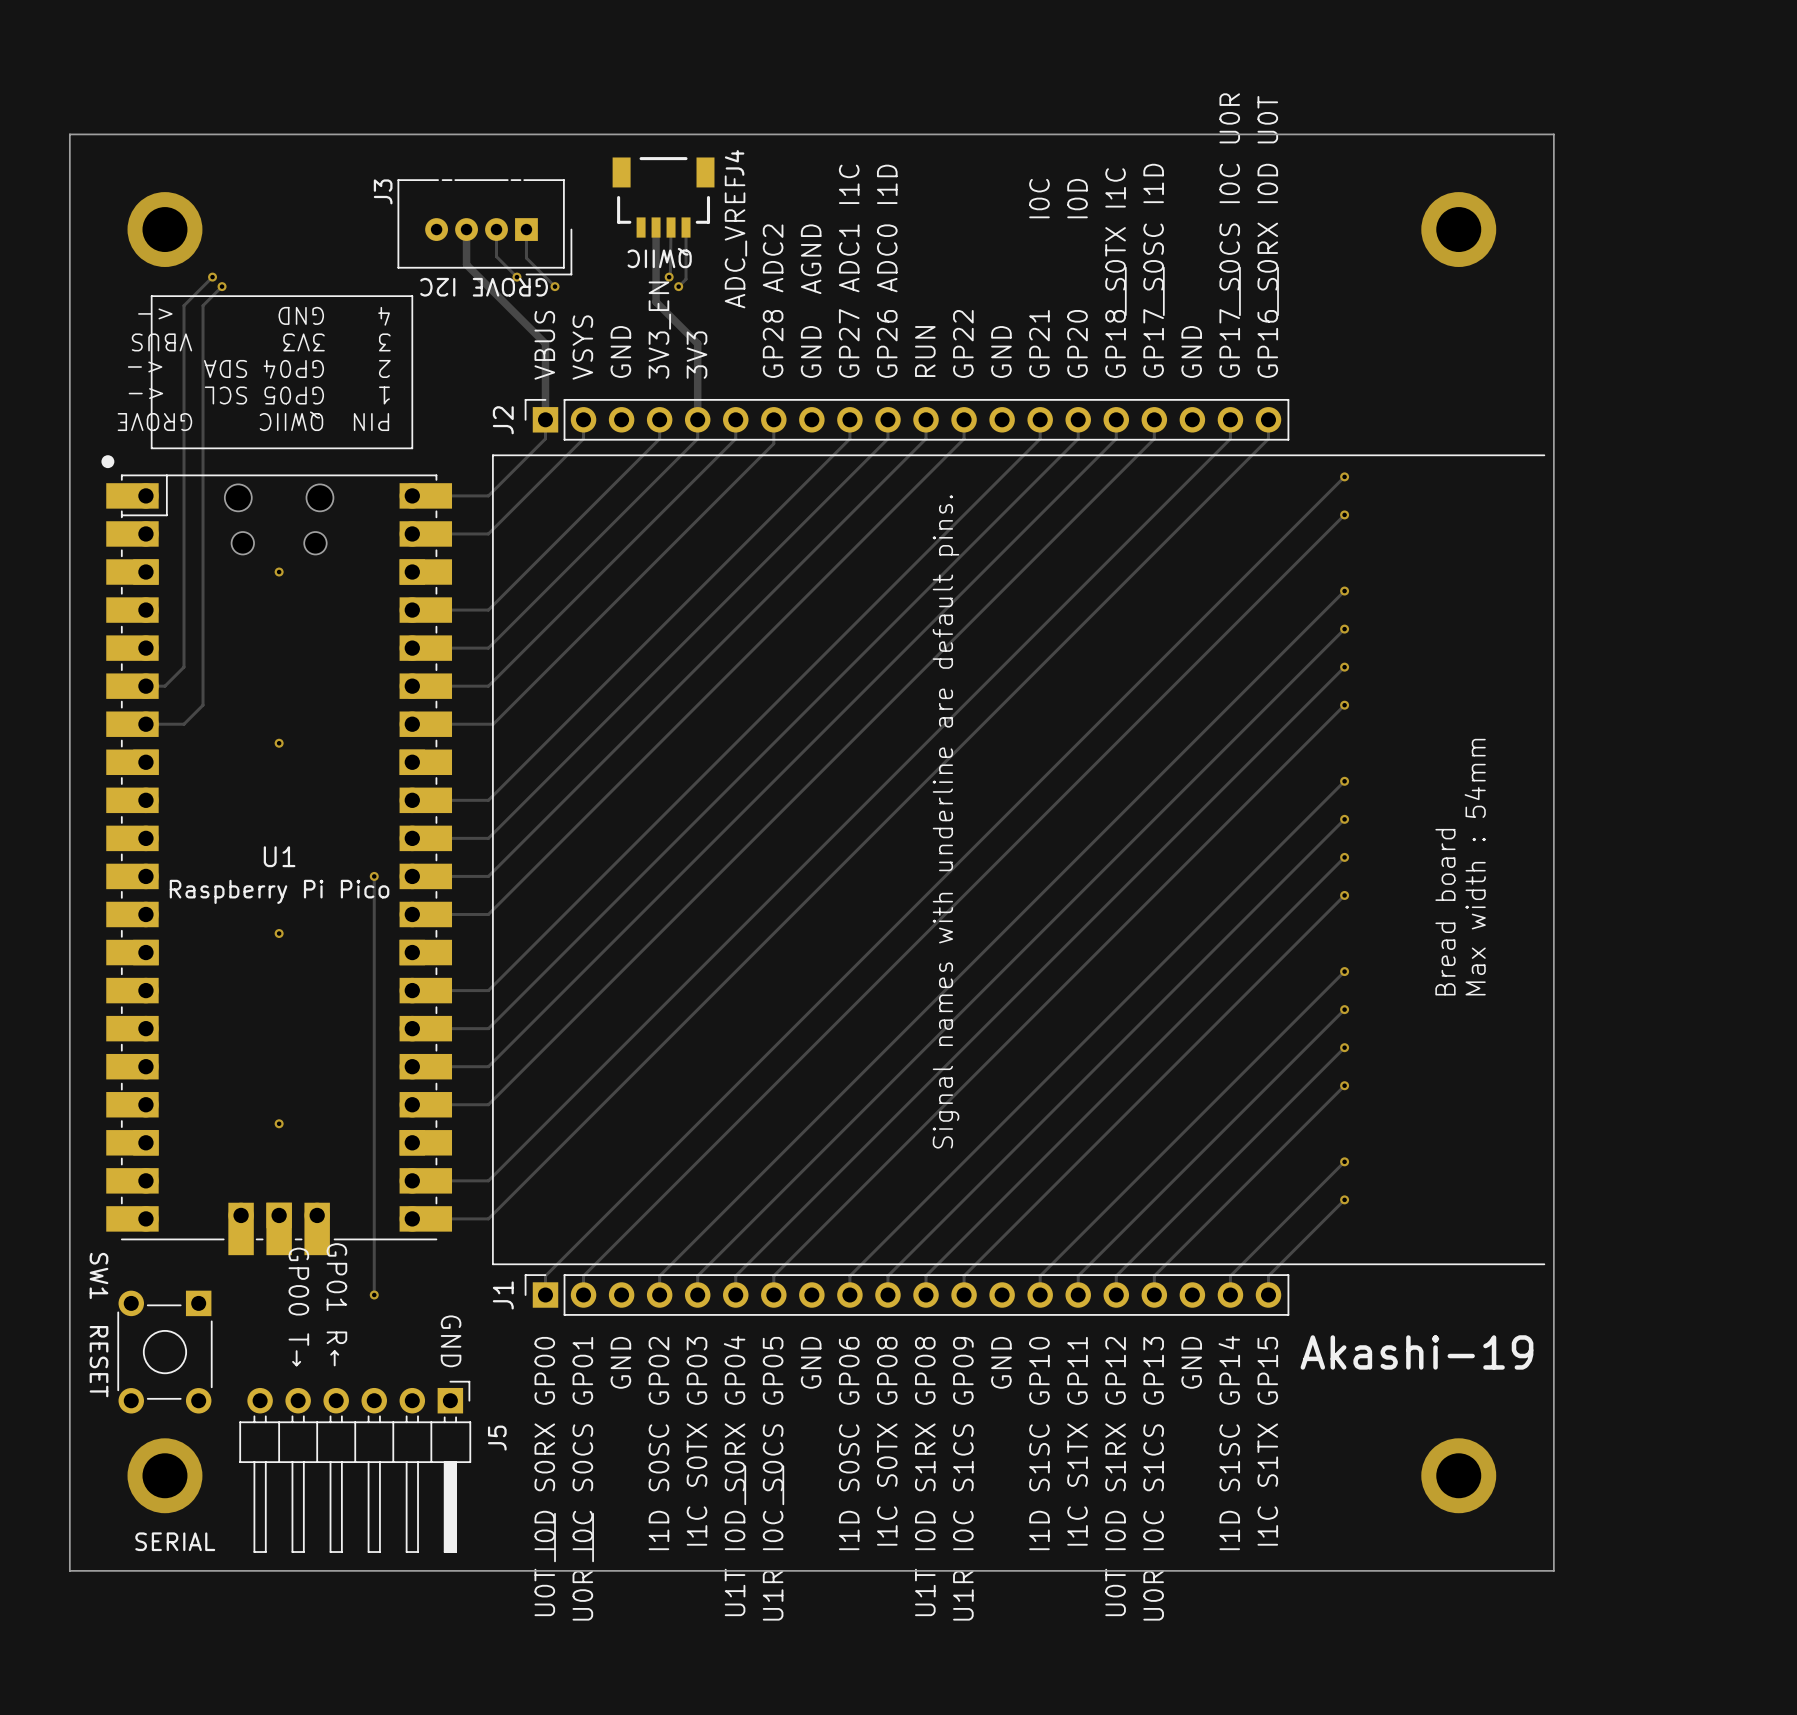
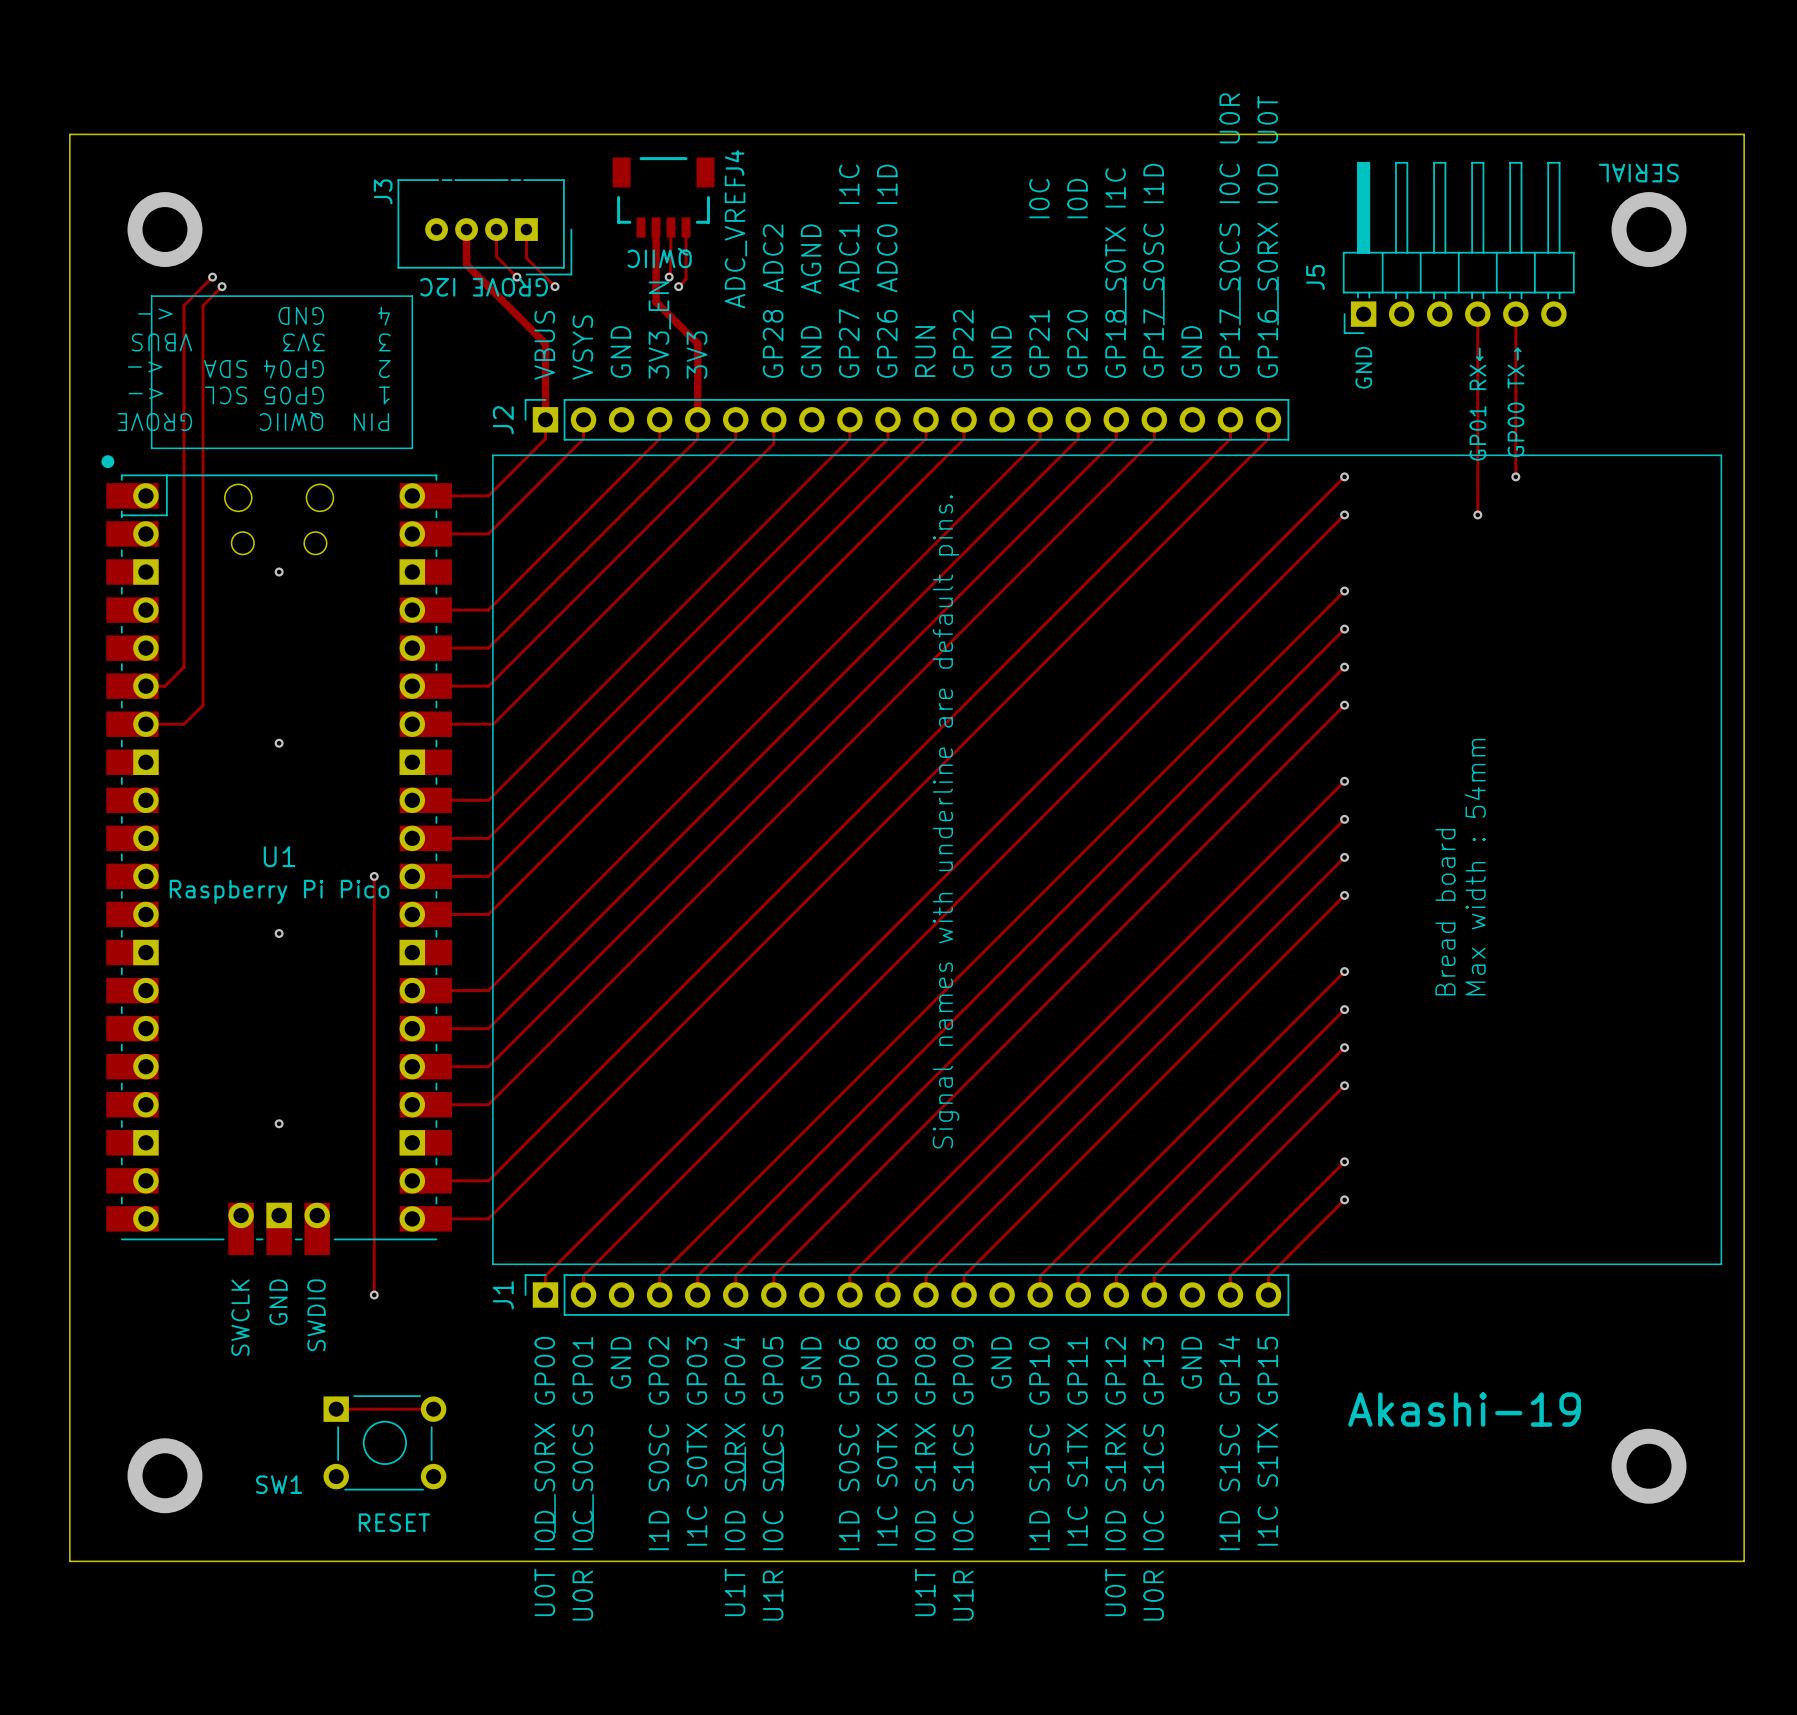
board edge: (1553, 134) (1553, 1570) (69, 1570) (69, 1561) -> (1553, 134) (1744, 134) (1744, 1561) (69, 1561)
via: (1458, 229) -> none
via: none -> (1649, 229)
line: (1125, 267) (1125, 277) -> (1125, 315) (1125, 324)
line: (1163, 267) (1163, 277) -> (1163, 315) (1163, 324)
line: (1239, 267) (1239, 277) -> (1239, 315) (1239, 324)
line: (1278, 267) (1278, 277) -> (1278, 315) (1278, 324)
track: none -> (1477, 314) (1477, 514)
track: none -> (1515, 314) (1515, 476)
text: none -> GND (1363, 367)
text: none -> GP00 TX→ (1516, 402)
text: none -> GP01 RX← (1477, 404)
line: none -> (1544, 455) (1721, 455) (1721, 1264) (1544, 1264)
via: none -> (1515, 476)
via: none -> (1477, 514)
SW1 name position: SW1 (98, 1275) -> SW1 (279, 1484)
U1 text: none -> GND (278, 1302)
text: GP01 R← (336, 1304) -> none
text: GP00 T→ (298, 1307) -> none
U1 text: none -> SWDIO (316, 1315)
U1 text: none -> SWCLK (240, 1317)
text: GND (451, 1341) -> none
SW1 rotation: 0° (164, 1352) -> 90° counterclockwise (384, 1442)
SW1 position: (164, 1352) -> (384, 1442)
text position: Akashi-19 (1416, 1352) -> Akashi-19 (1464, 1409)
track: none -> (336, 1409) (433, 1409)
J5 rotation: 0° (355, 1466) -> 180° (1458, 247)
J5 position: (355, 1466) -> (1458, 247)
via: none -> (1649, 1466)
via: (1458, 1475) -> none
line: (745, 1485) (745, 1504) -> (745, 1447) (745, 1466)
line: (783, 1485) (783, 1504) -> (783, 1447) (783, 1466)
line: none -> (555, 1494) (555, 1513)
line: none -> (593, 1494) (593, 1513)
line: (555, 1532) (555, 1561) -> none
line: (593, 1532) (593, 1561) -> none

